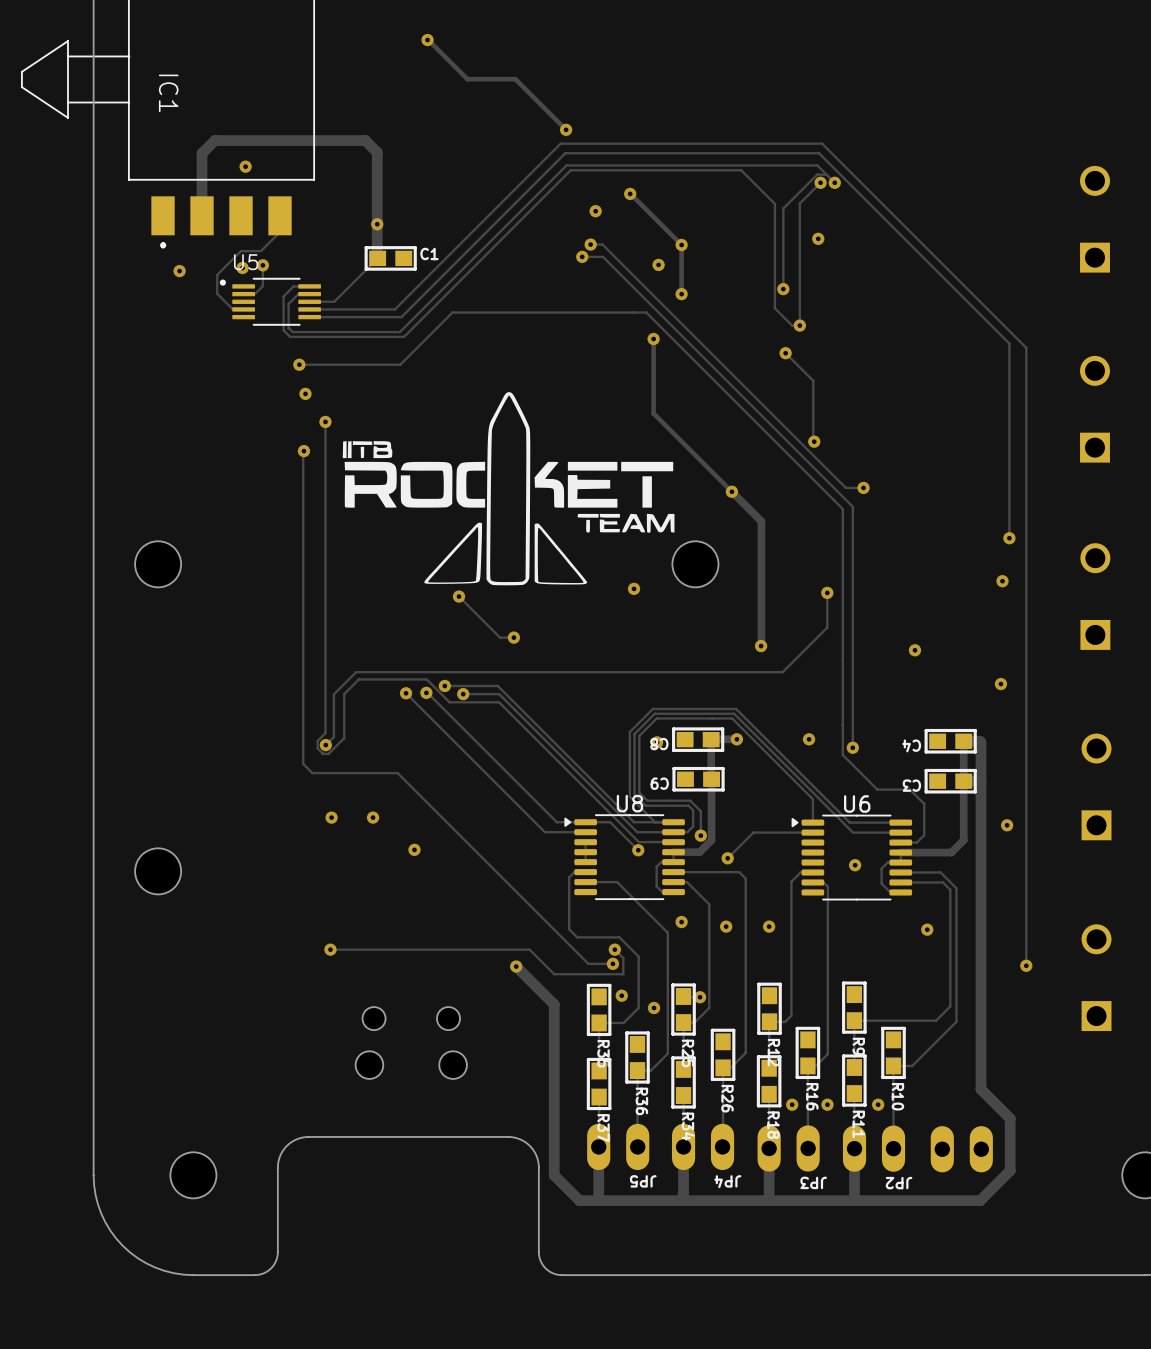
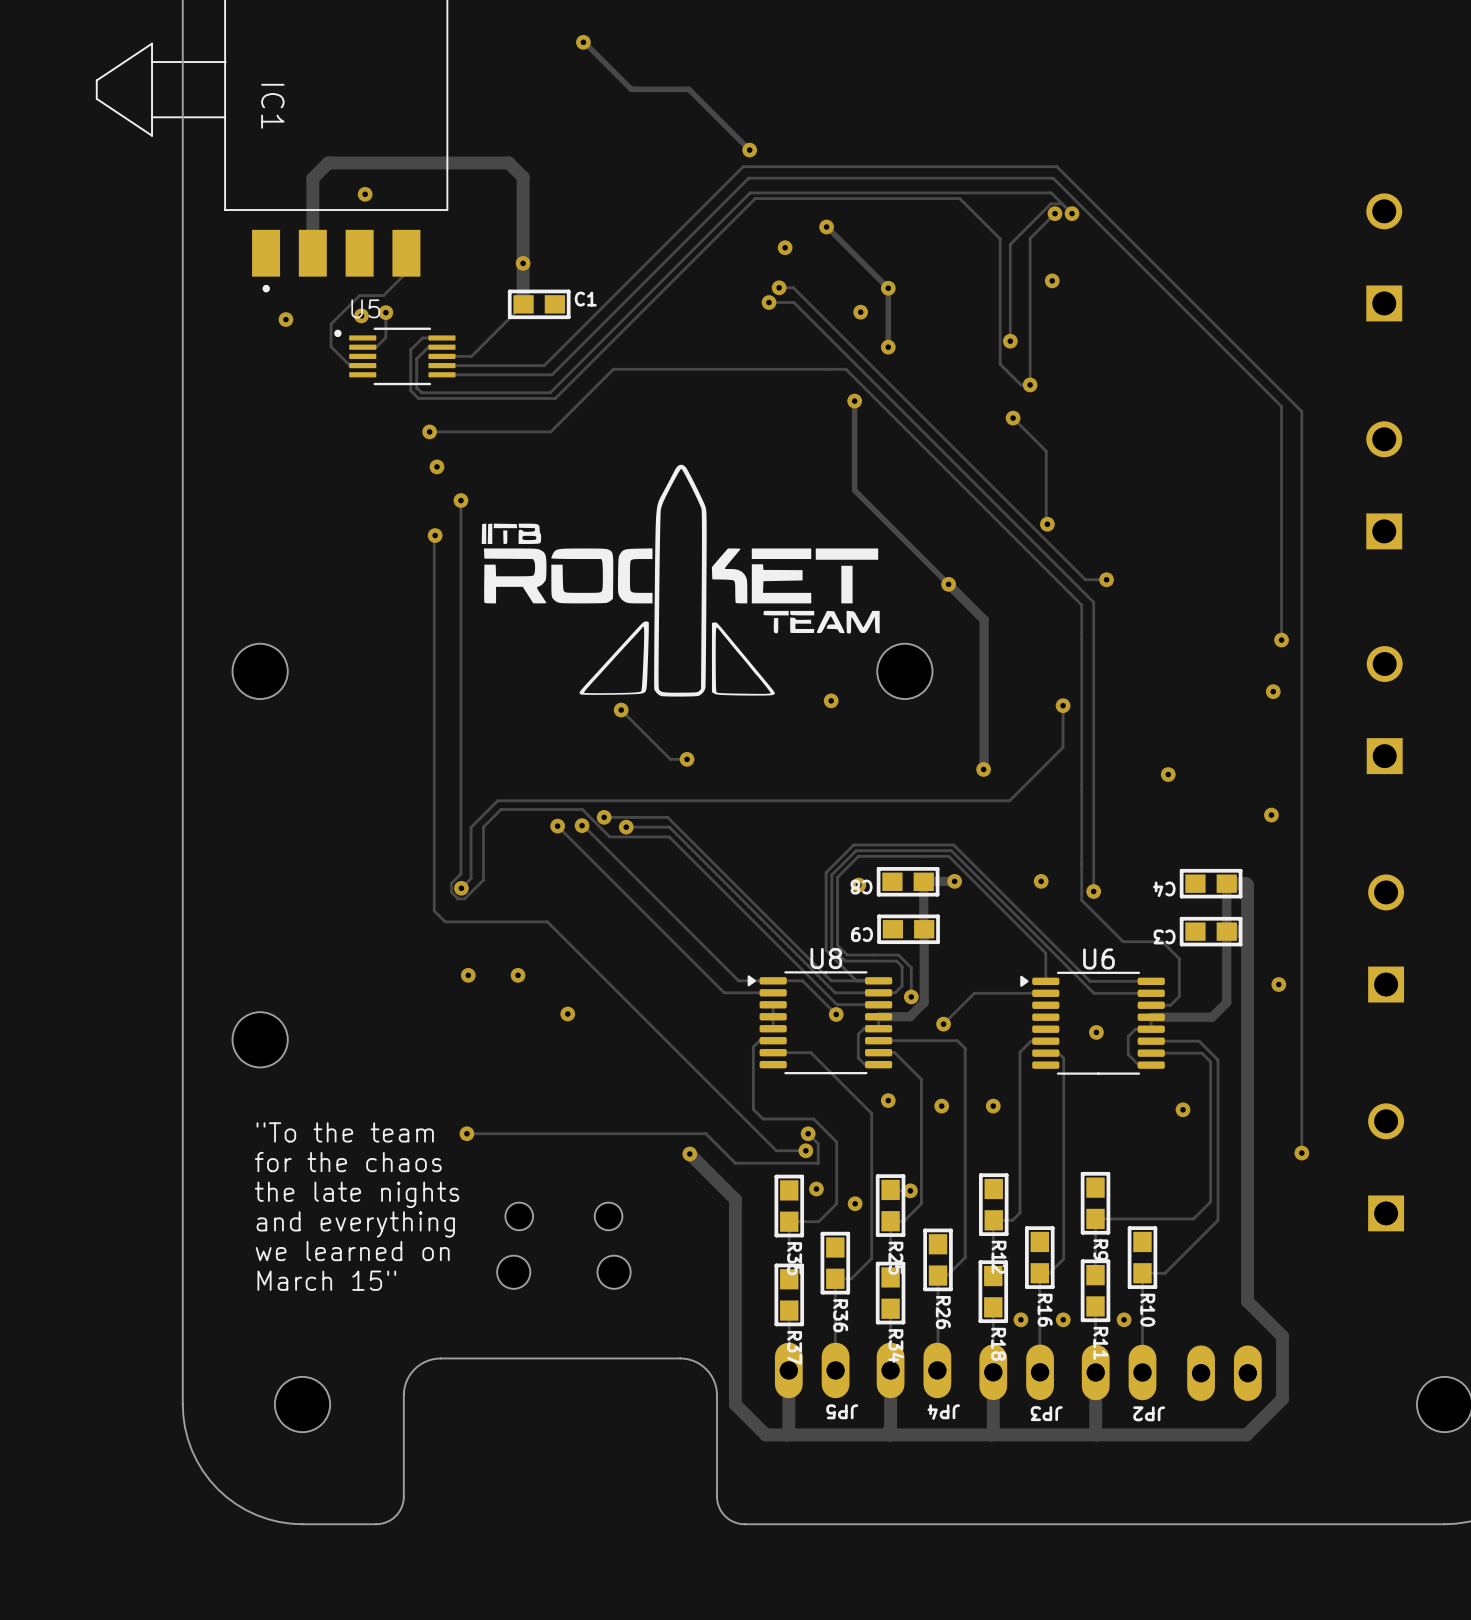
text: none -> "To the team (345, 1132)
text: none -> for the chaos (348, 1162)
text: none -> the late nights (357, 1194)
text: none -> and everything (355, 1224)
text: none -> we learned on (352, 1251)
text: none -> March 15" (326, 1280)

